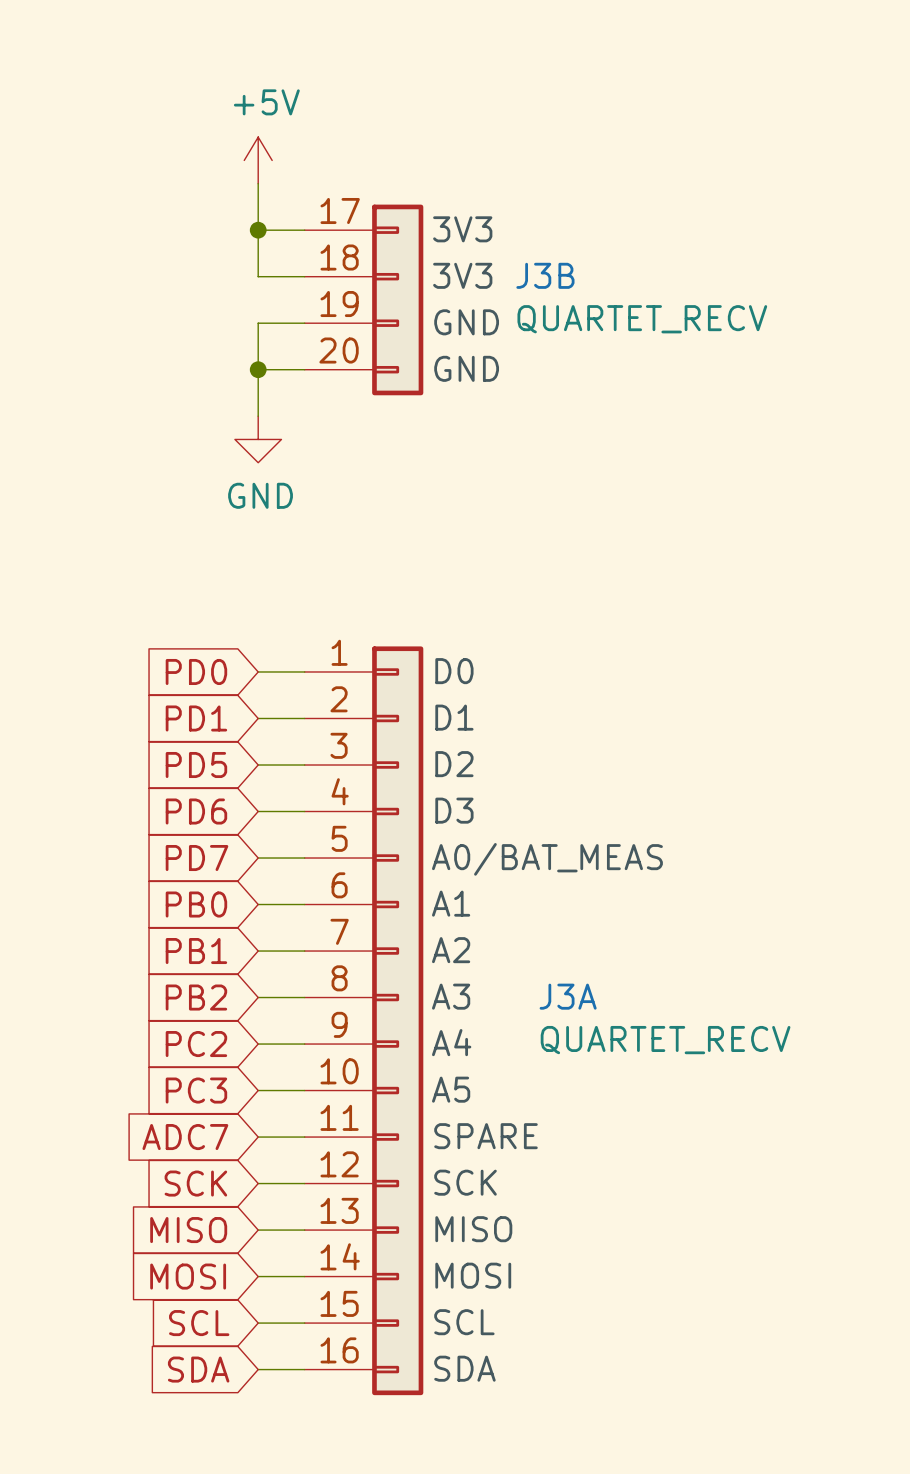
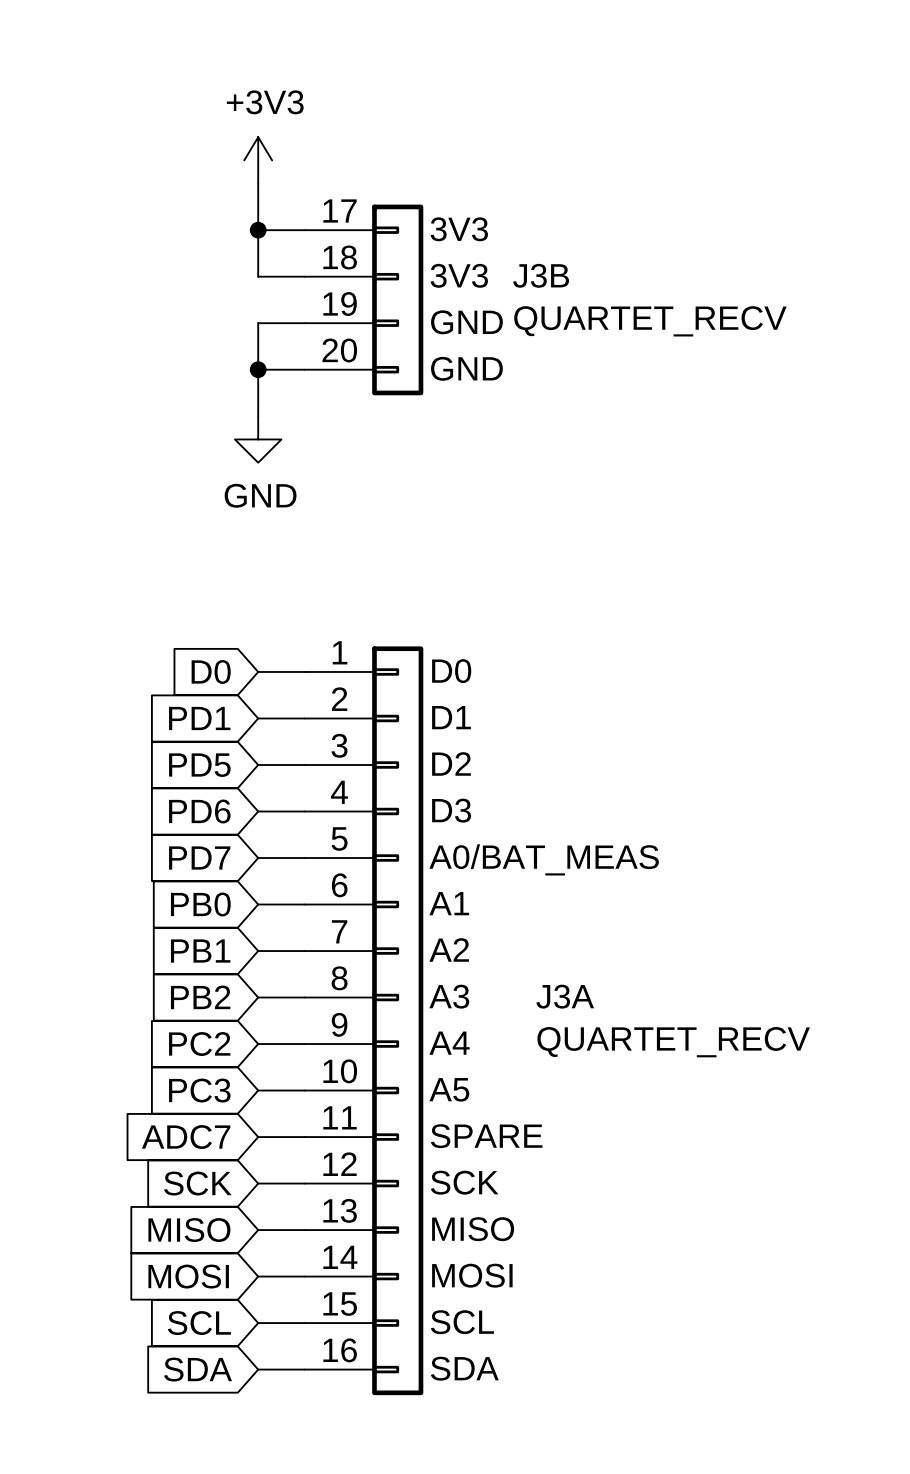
power symbol: +5V (258, 160) -> +3V3 (258, 160)
global label: PD0 (196, 671) -> D0 (211, 671)

